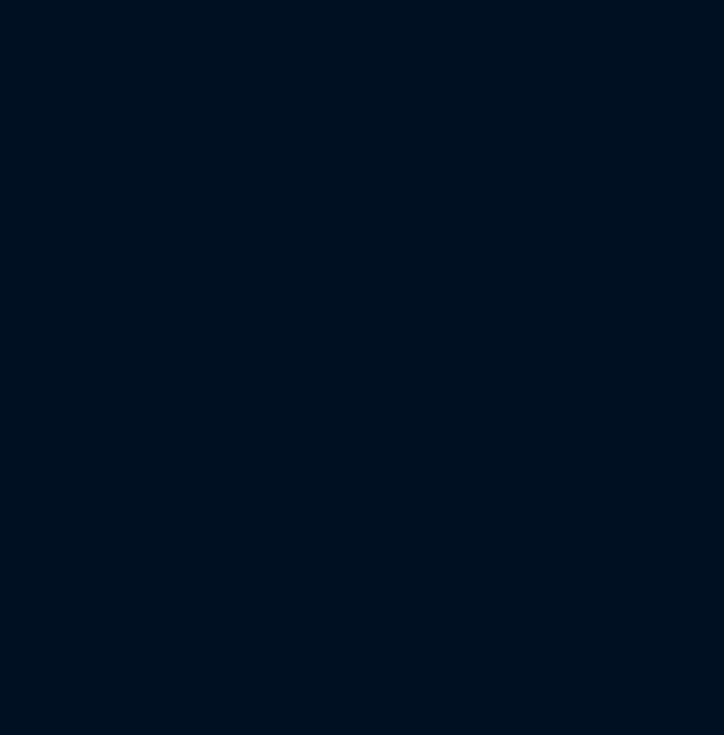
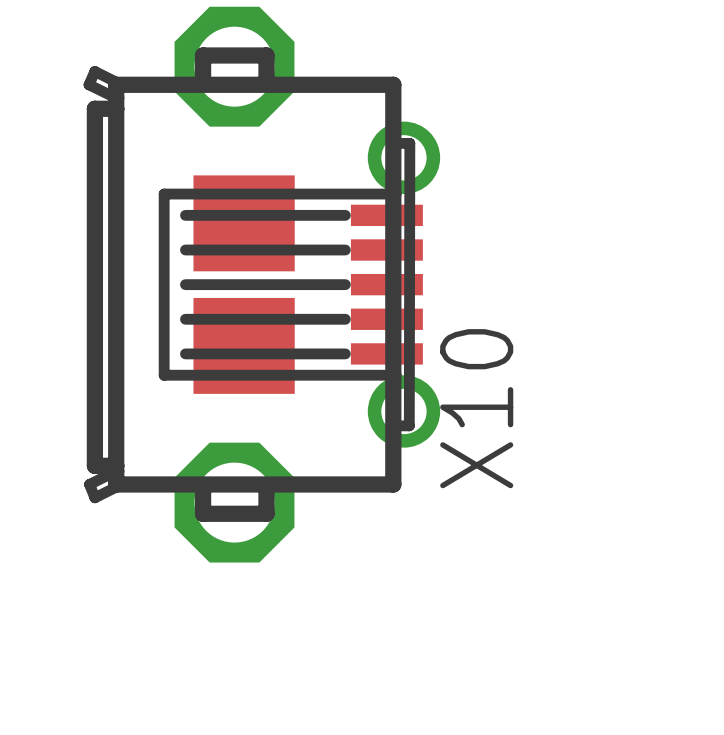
X10: none -> (261, 284)

